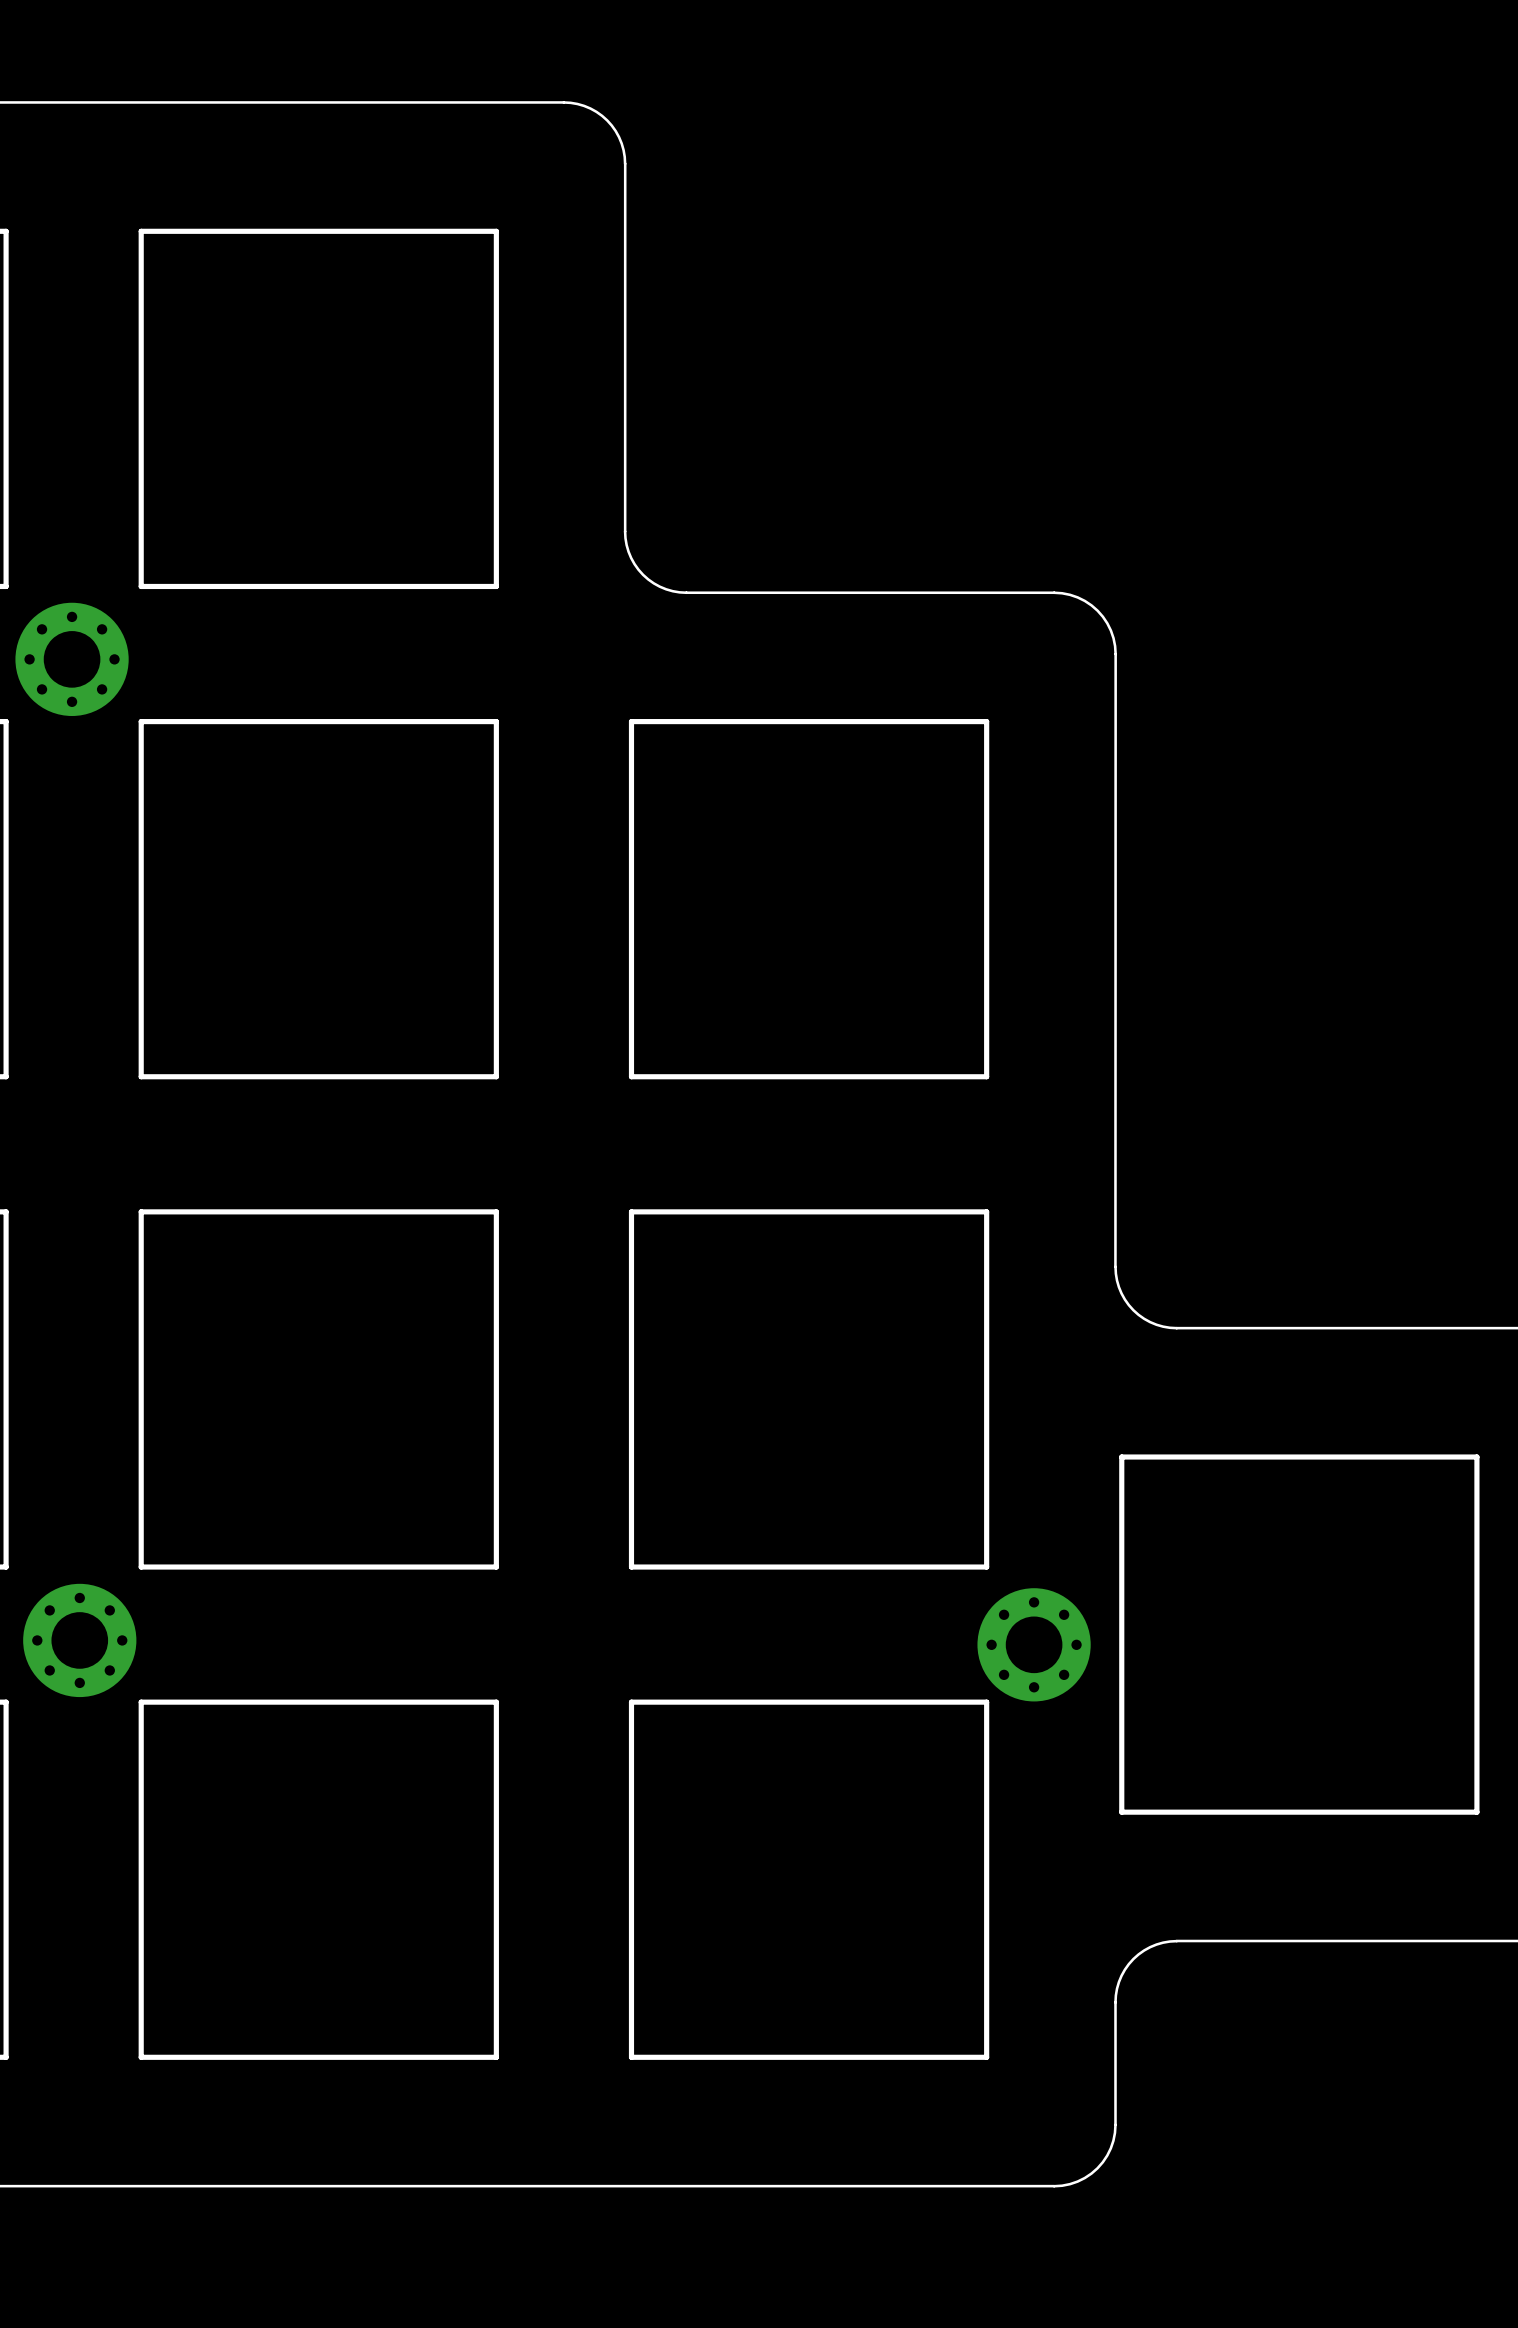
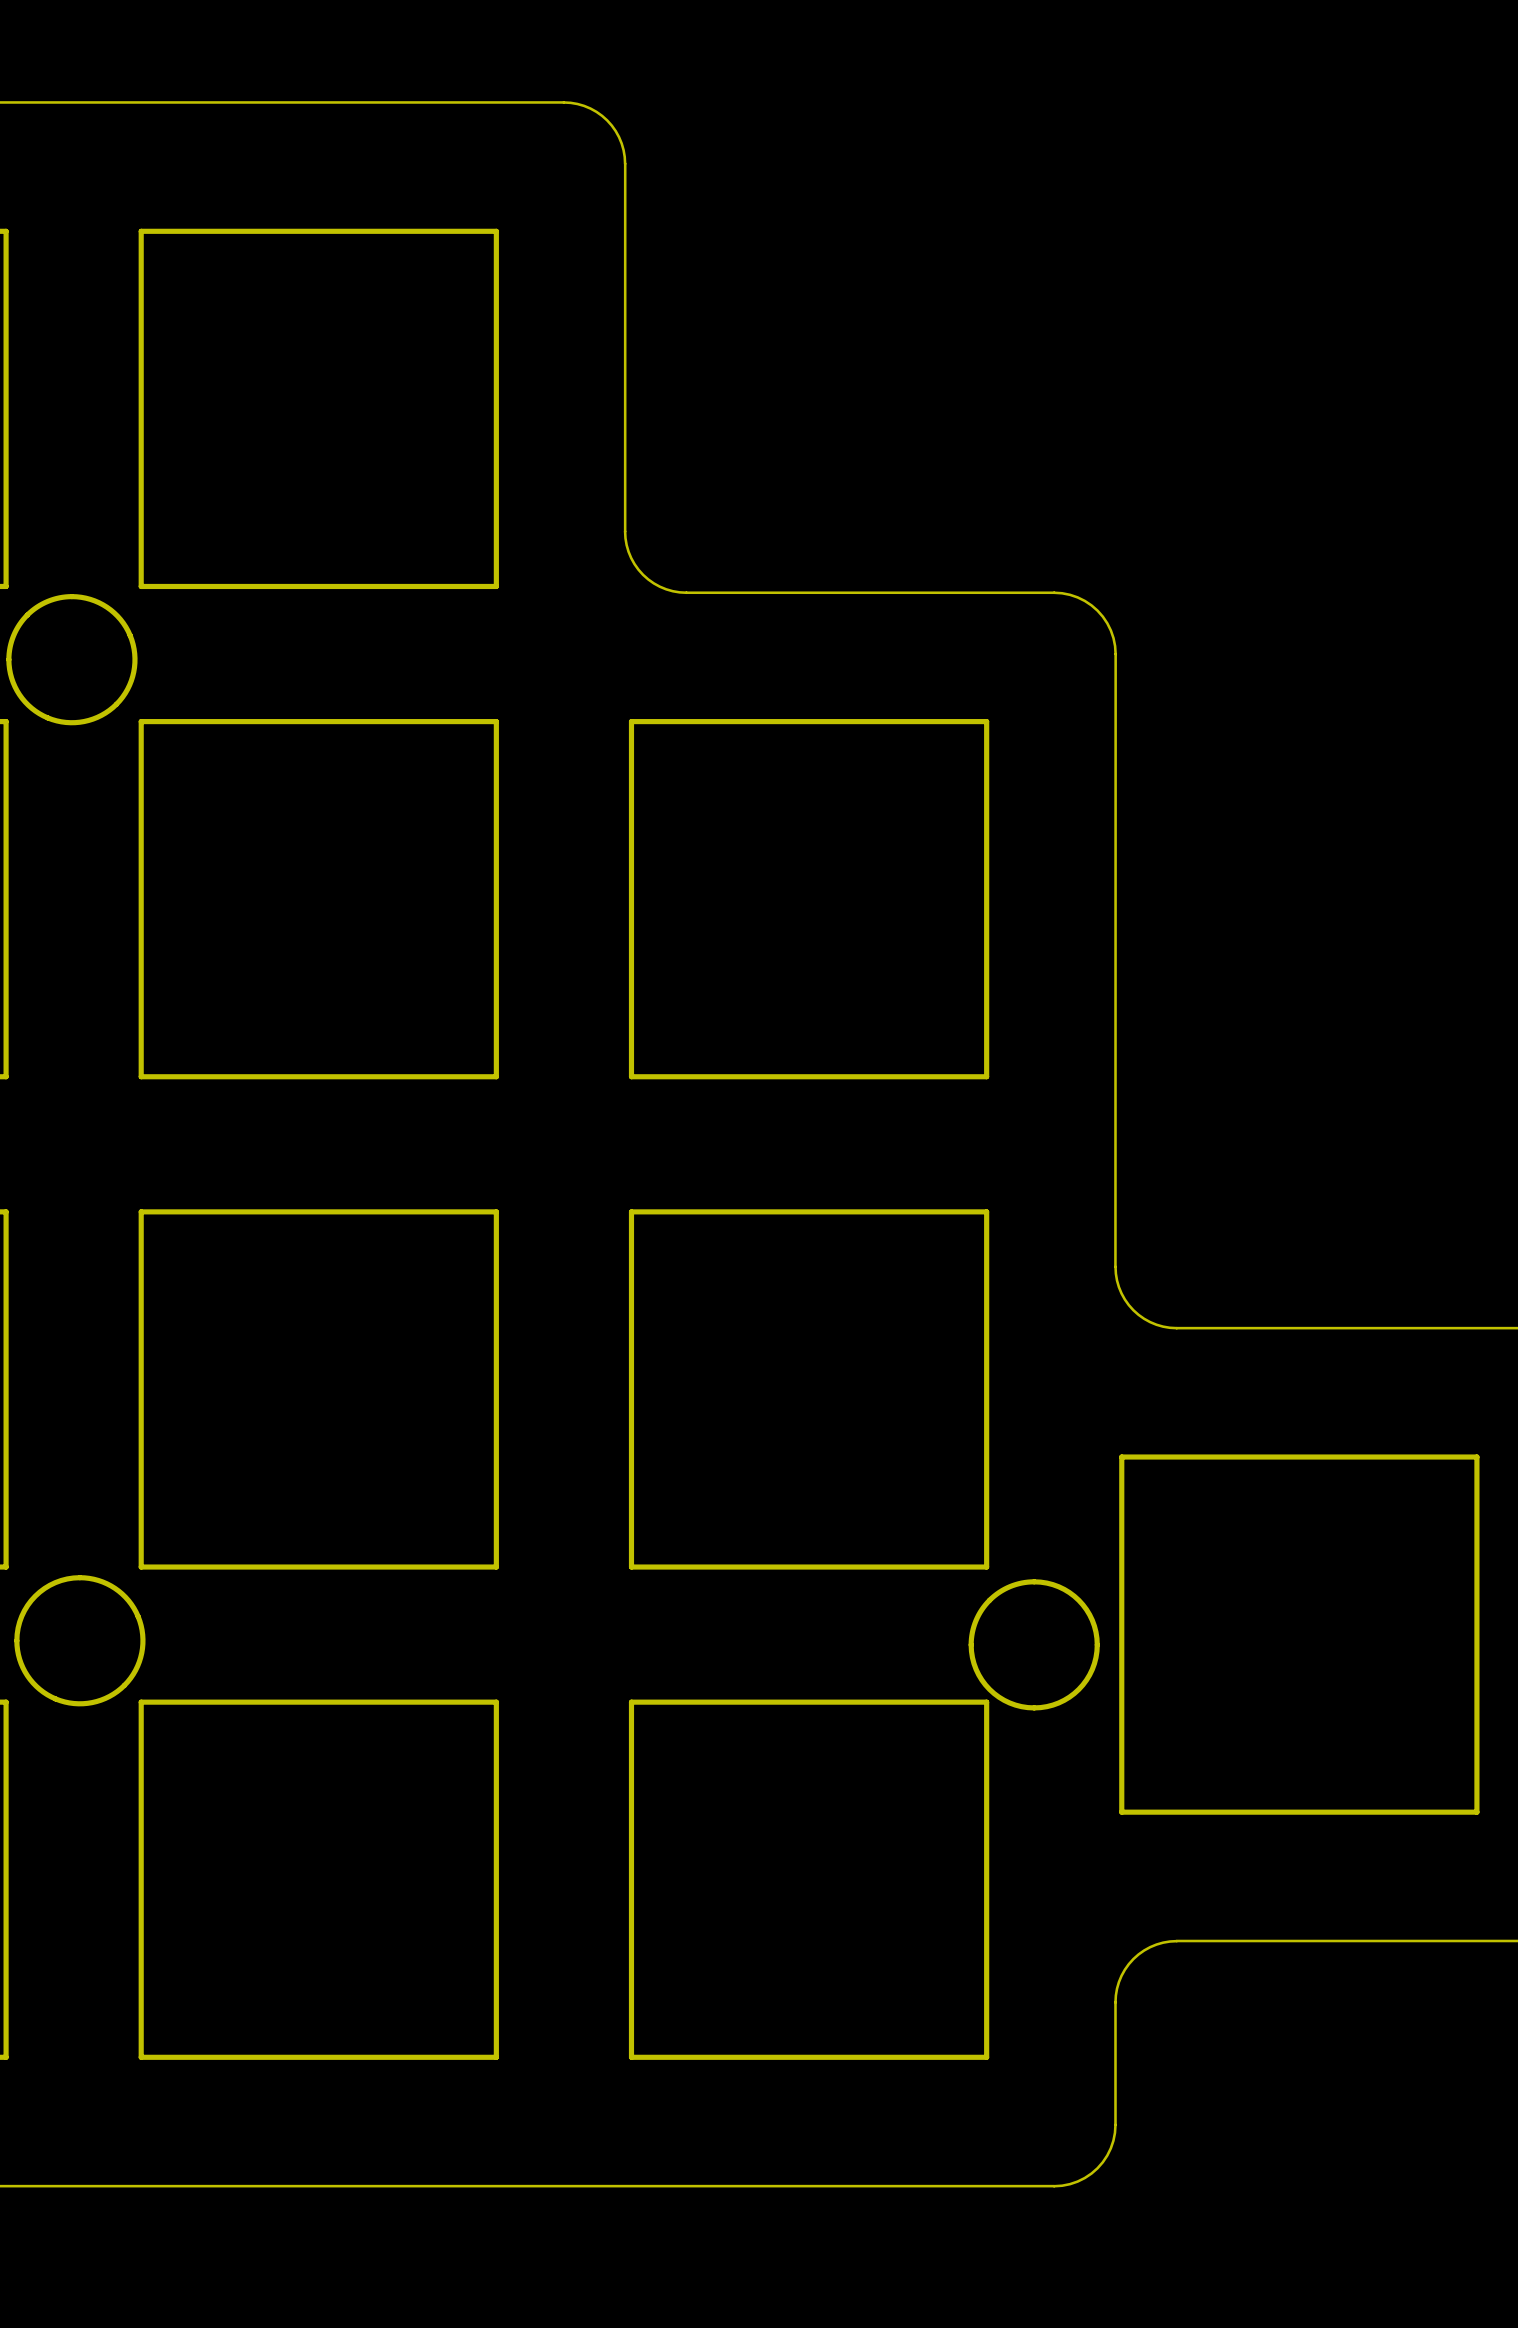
board edge: none -> (71, 596) (94, 600) (117, 616) (130, 635) (134, 658) (129, 685) (116, 704) (97, 717) (70, 722) (47, 717) (28, 705) (13, 682) (8, 659) (13, 635) (27, 615) (47, 601) (71, 596)
part: (72, 659) -> none
board edge: none -> (79, 1577) (55, 1582) (35, 1596) (21, 1616) (16, 1640) (21, 1663) (36, 1686) (55, 1699) (78, 1703) (105, 1698) (124, 1685) (137, 1666) (142, 1639) (138, 1616) (125, 1597) (102, 1581) (79, 1577)
board edge: none -> (1034, 1581) (1058, 1586) (1078, 1600) (1092, 1620) (1097, 1644) (1092, 1669) (1078, 1689) (1058, 1702) (1034, 1707) (1009, 1702) (989, 1689) (976, 1669) (971, 1644) (975, 1620) (989, 1600) (1010, 1586) (1034, 1581)
part: (79, 1640) -> none
part: (1034, 1644) -> none

